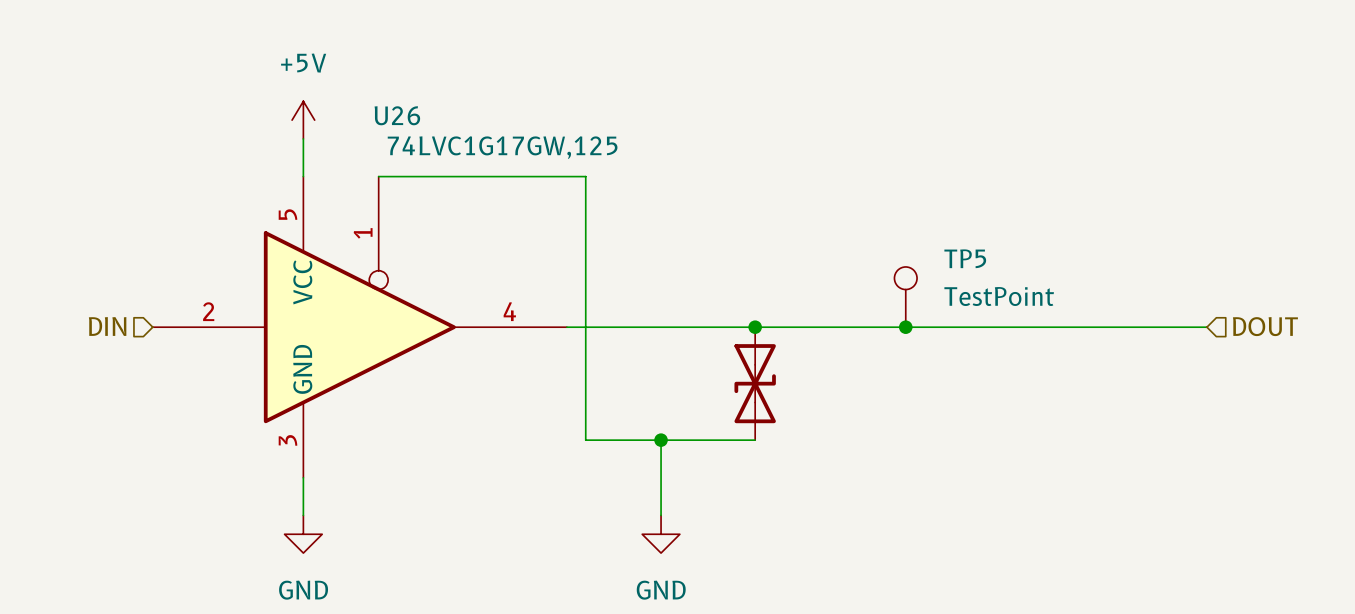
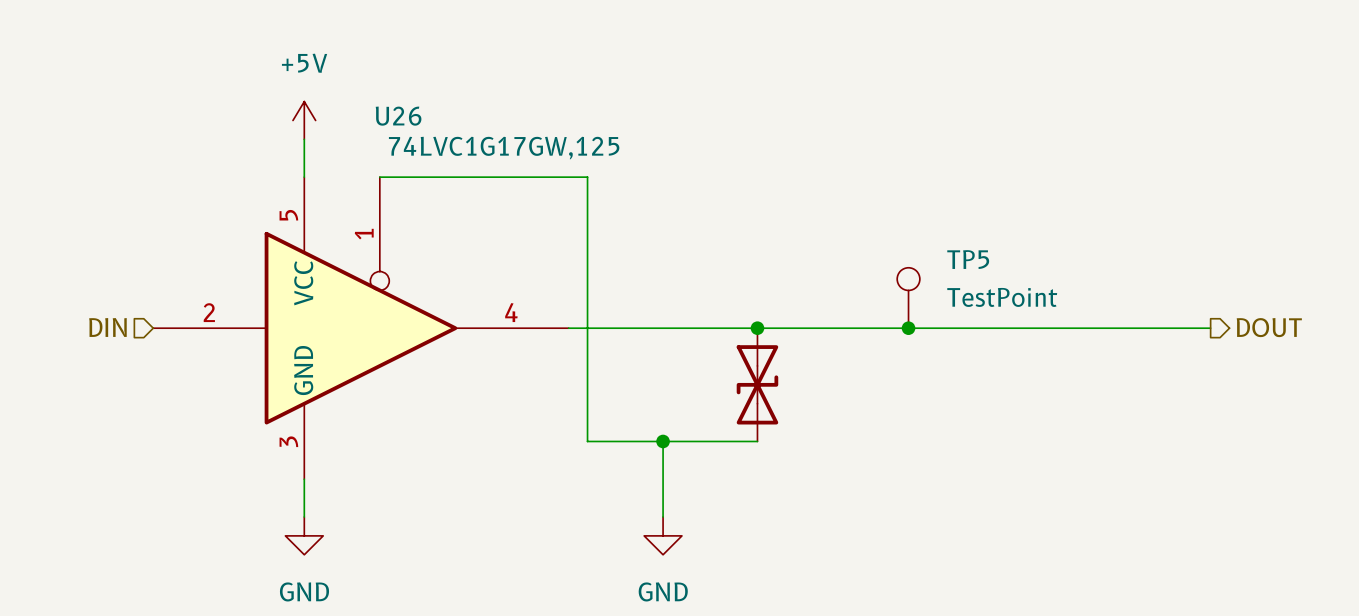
hierarchical label shape: input (1265, 326) -> output (1269, 327)

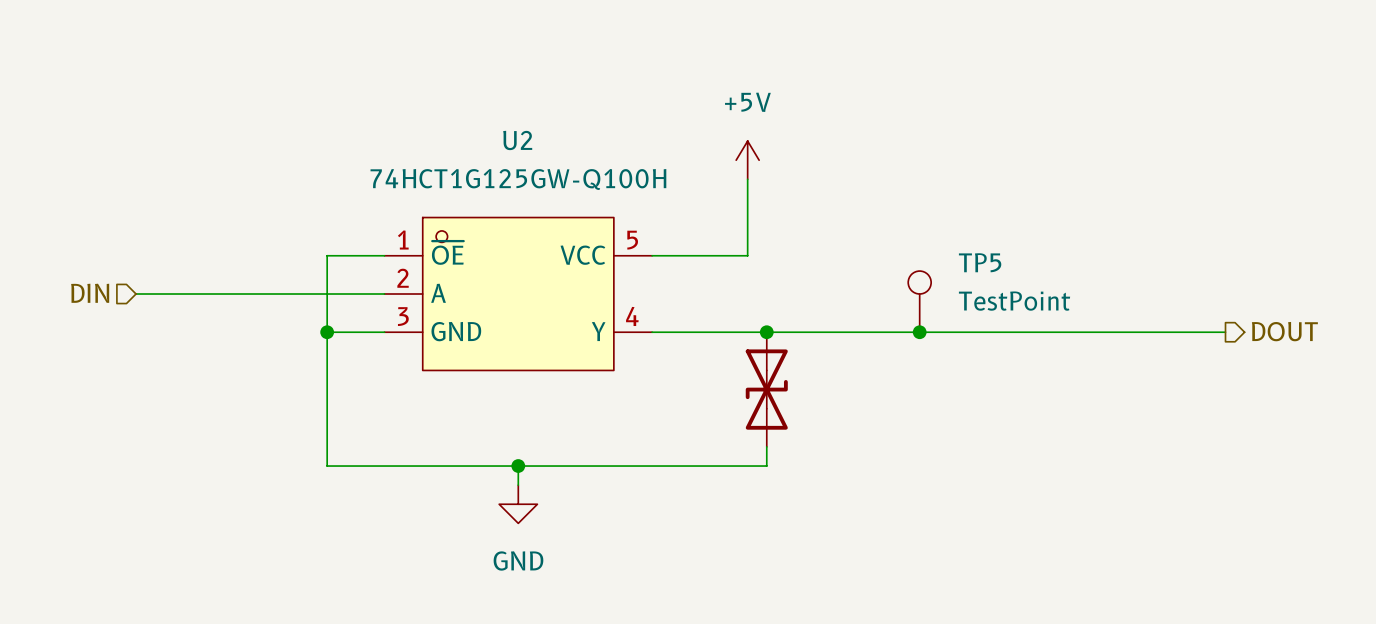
power symbol: +5V (304, 120) -> none
wire: (304, 139) (304, 177) -> none
power symbol: none -> +5V (747, 160)
wire: (379, 177) (587, 177) (587, 441) (757, 441) -> (384, 255) (327, 255) (327, 466) (766, 466) (766, 446)
wire: none -> (747, 179) (747, 255) (652, 255)
wire: none -> (136, 294) (384, 294)
U2: none -> 74HCT1G125GW-Q100H (518, 294)
hierarchical label position: DIN (107, 327) -> DIN (90, 293)
junction: none -> (327, 332)
U26: 74LVC1G17GW,125 (360, 328) -> none
wire: (663, 441) (663, 517) -> none
junction: (663, 441) -> none
wire: none -> (518, 466) (518, 485)
junction: none -> (518, 466)
wire: (304, 479) (304, 517) -> none
power symbol: none -> GND (518, 504)
power symbol: GND (304, 535) -> none
power symbol: GND (663, 535) -> none

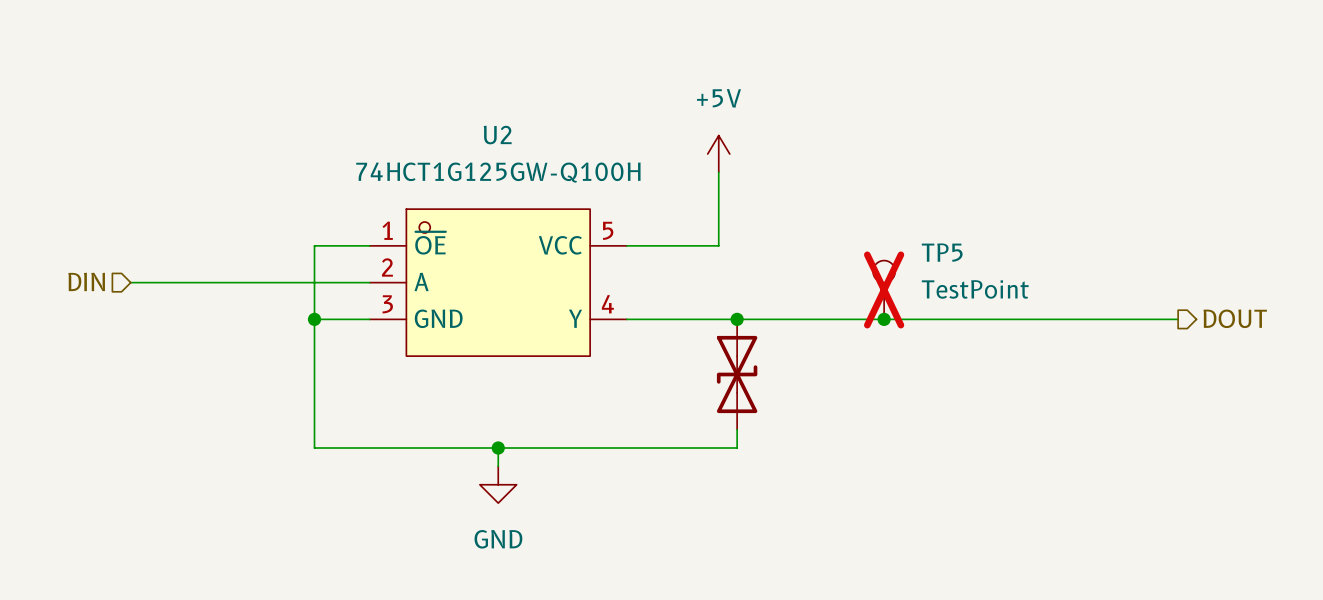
TP5 do-not-place cross: none -> (884, 289)

